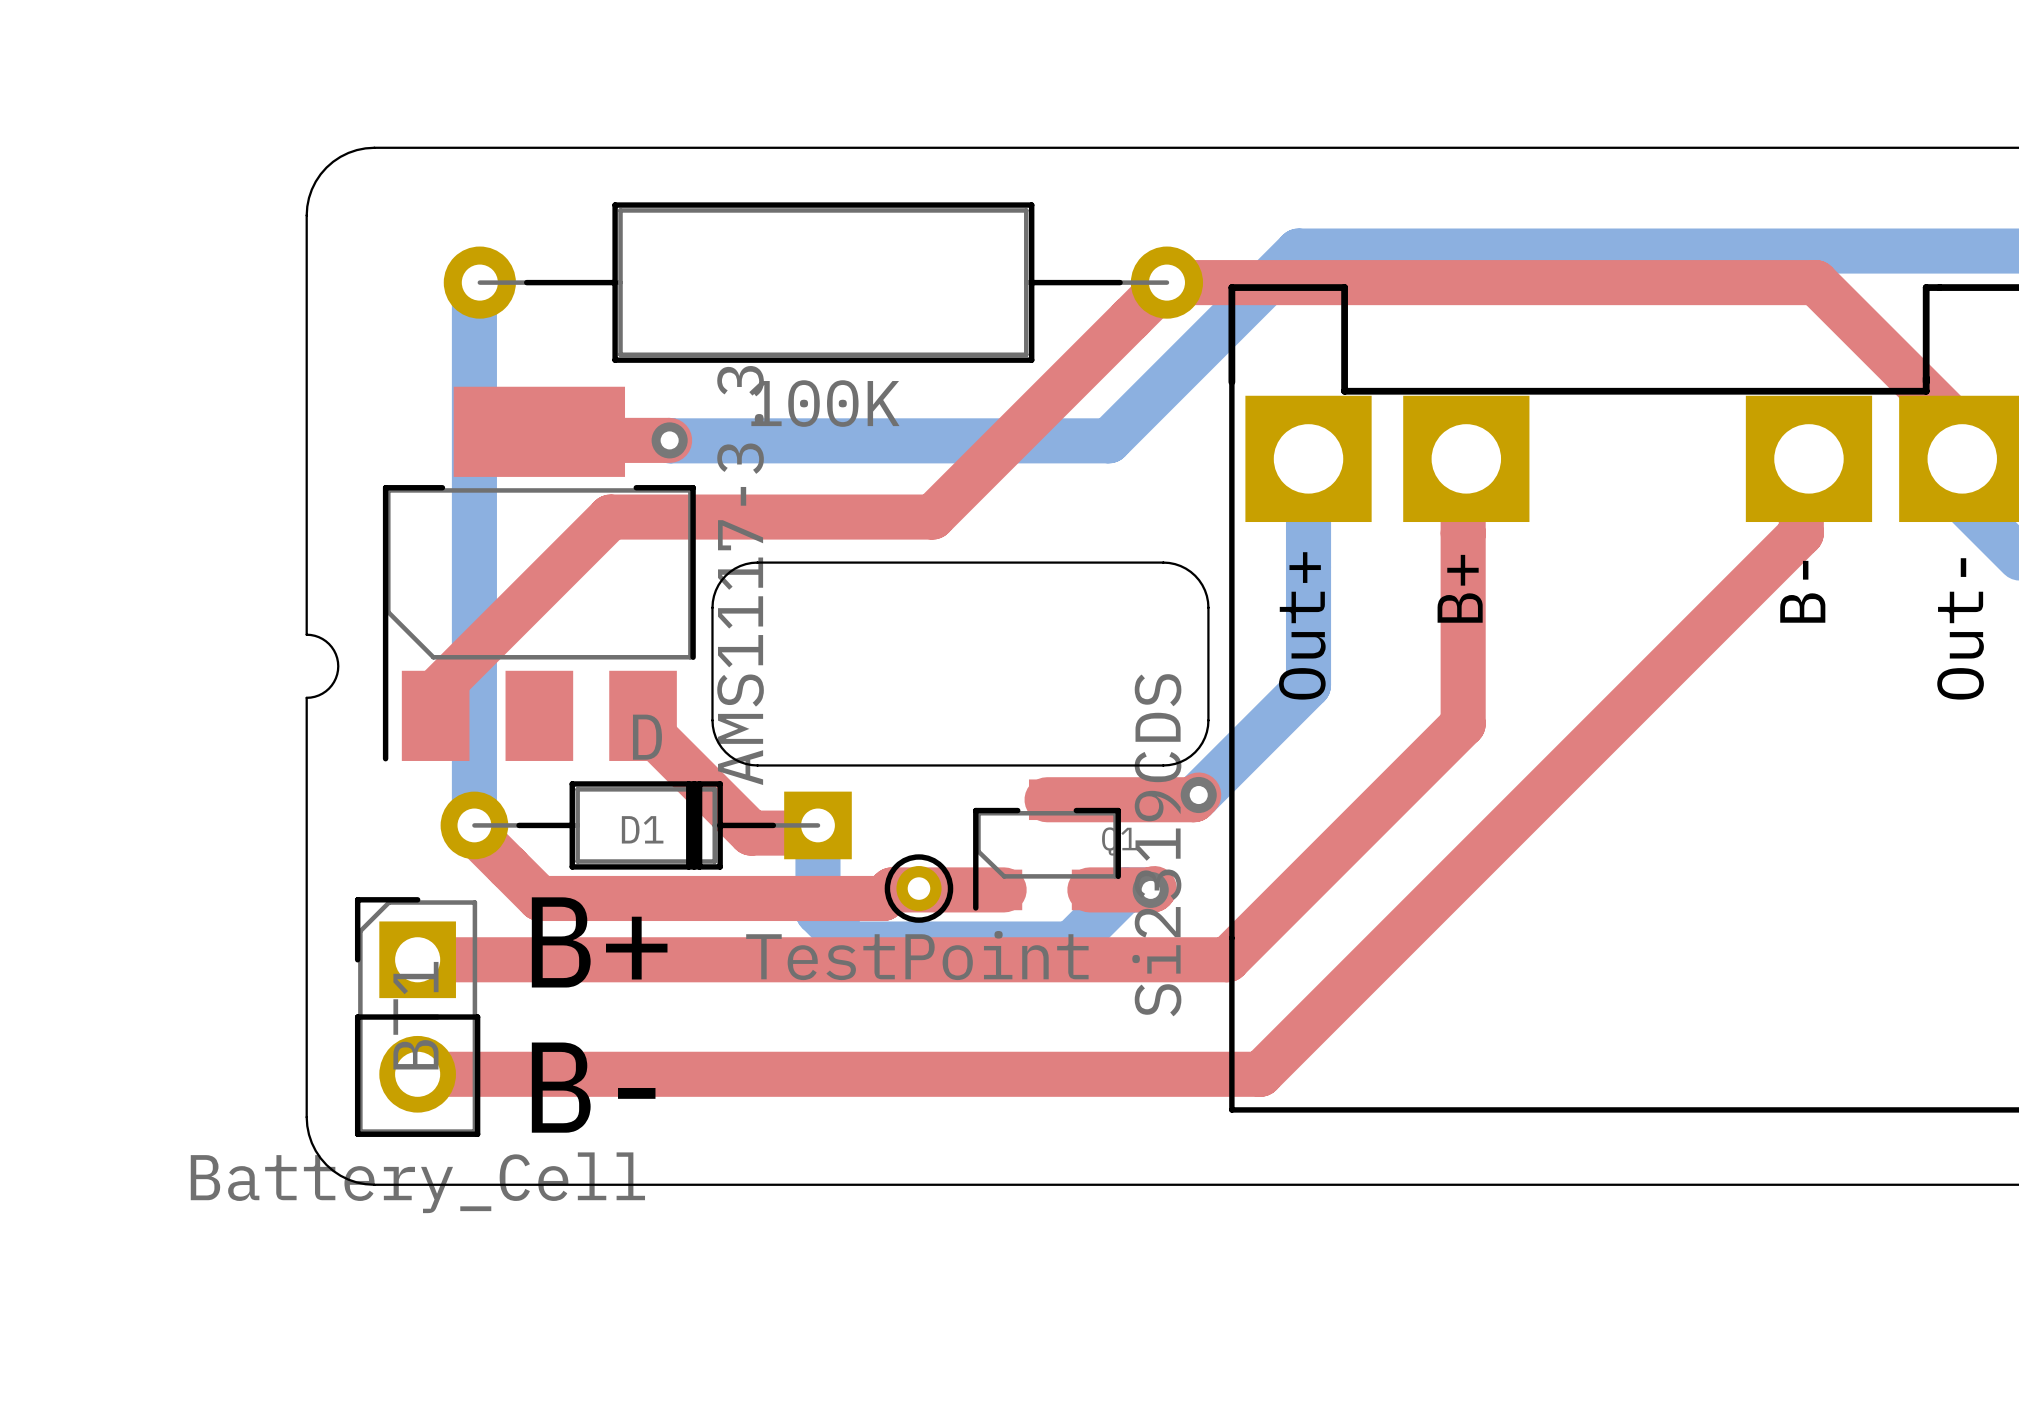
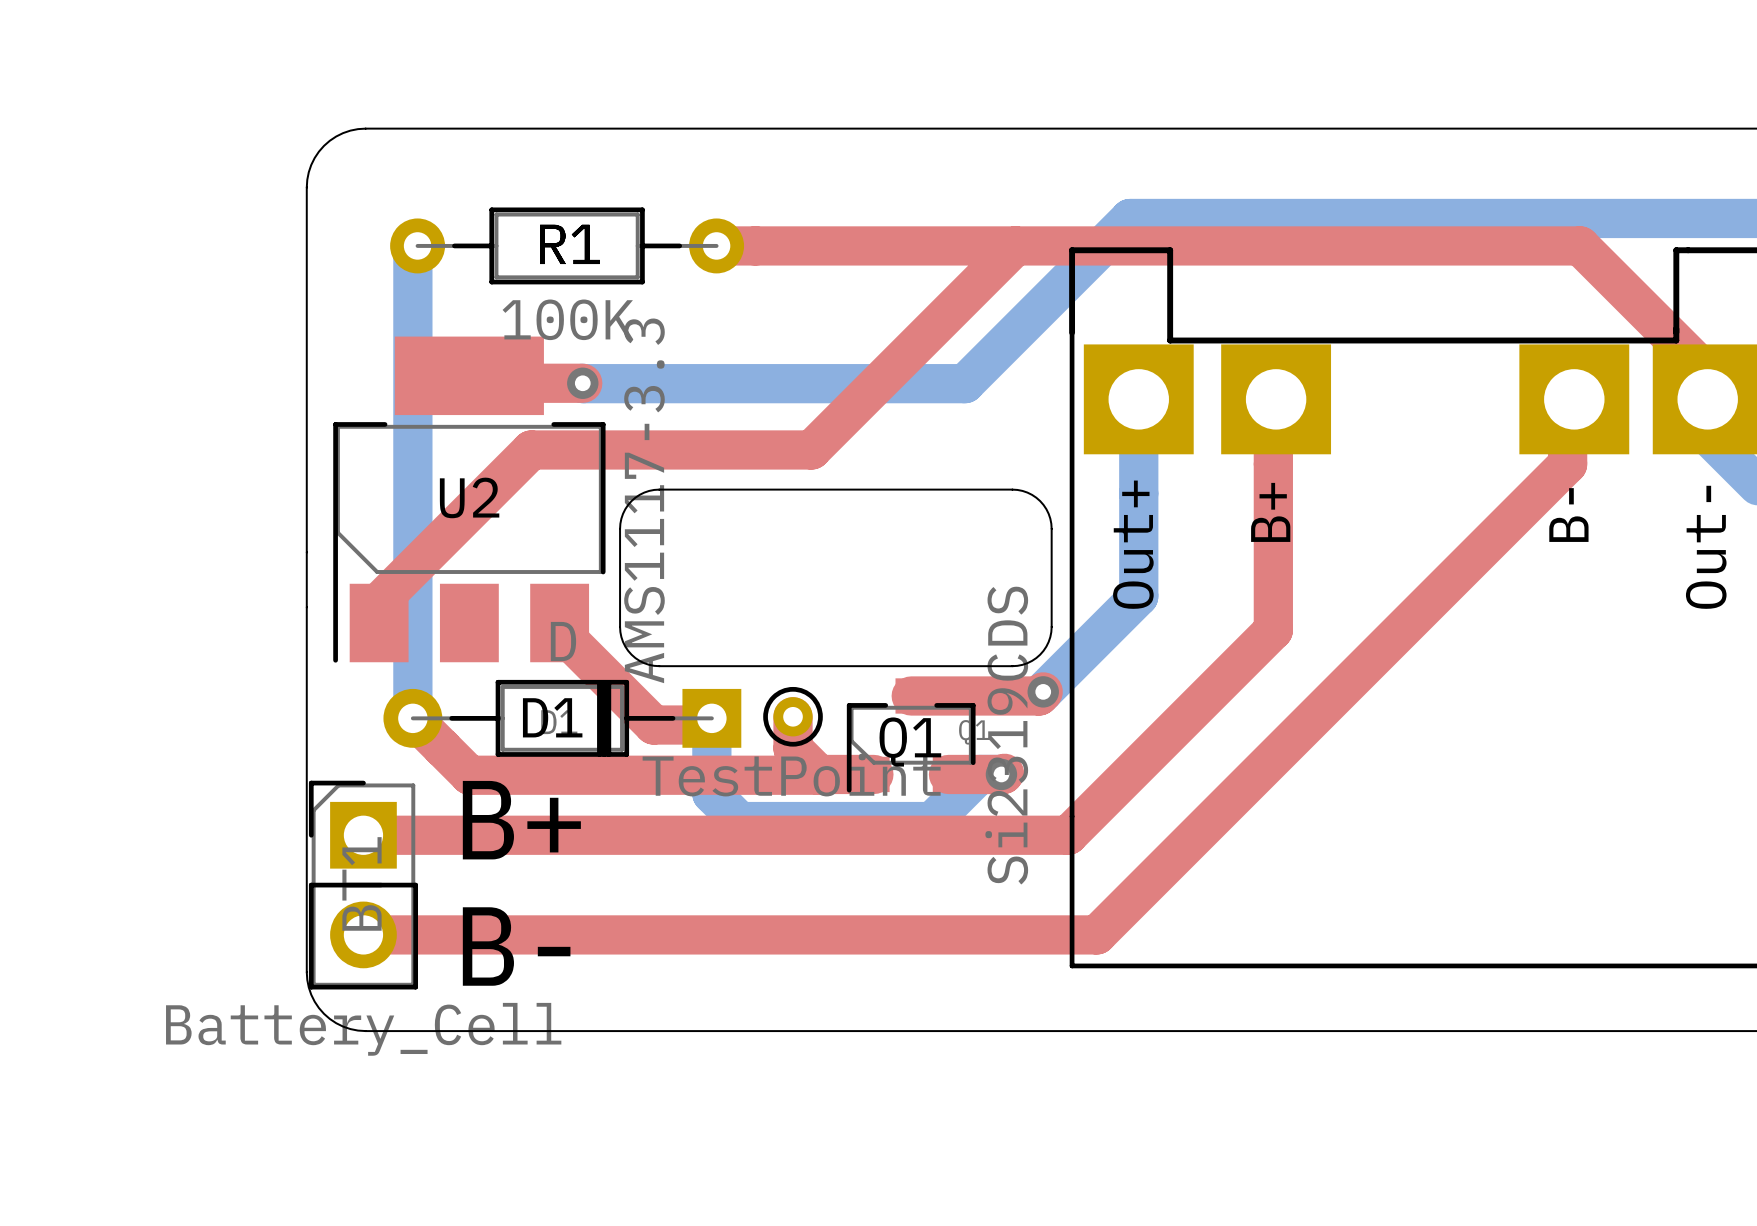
board edge: (420, 147) (365, 148) (340, 156) (326, 167) (315, 181) (309, 197) (306, 215) (306, 634) (318, 637) (329, 643) (335, 654) (338, 666) (335, 678) (329, 688) (318, 695) (306, 697) (307, 1125) (311, 1143) (320, 1158) (340, 1175) (365, 1184) (420, 1184) -> (365, 128) (343, 133) (324, 145) (311, 164) (306, 187) (307, 979) (314, 1001) (329, 1018) (343, 1026) (365, 1031)
text: none -> R1 (569, 244)
R1: none -> 100K (567, 245)
top track: none -> (716, 245) (1015, 245)
part: 100K (823, 282) -> none
U2 name: none -> U2 (469, 497)
top track: none -> (793, 716) (793, 748) (818, 775) (469, 775) (412, 718)
text: none -> D1 (552, 717)
top track: (474, 833) (539, 898) (883, 898) (891, 889) (941, 889) -> none
text: none -> Q1 (910, 742)
part position: (918, 888) -> (793, 716)

